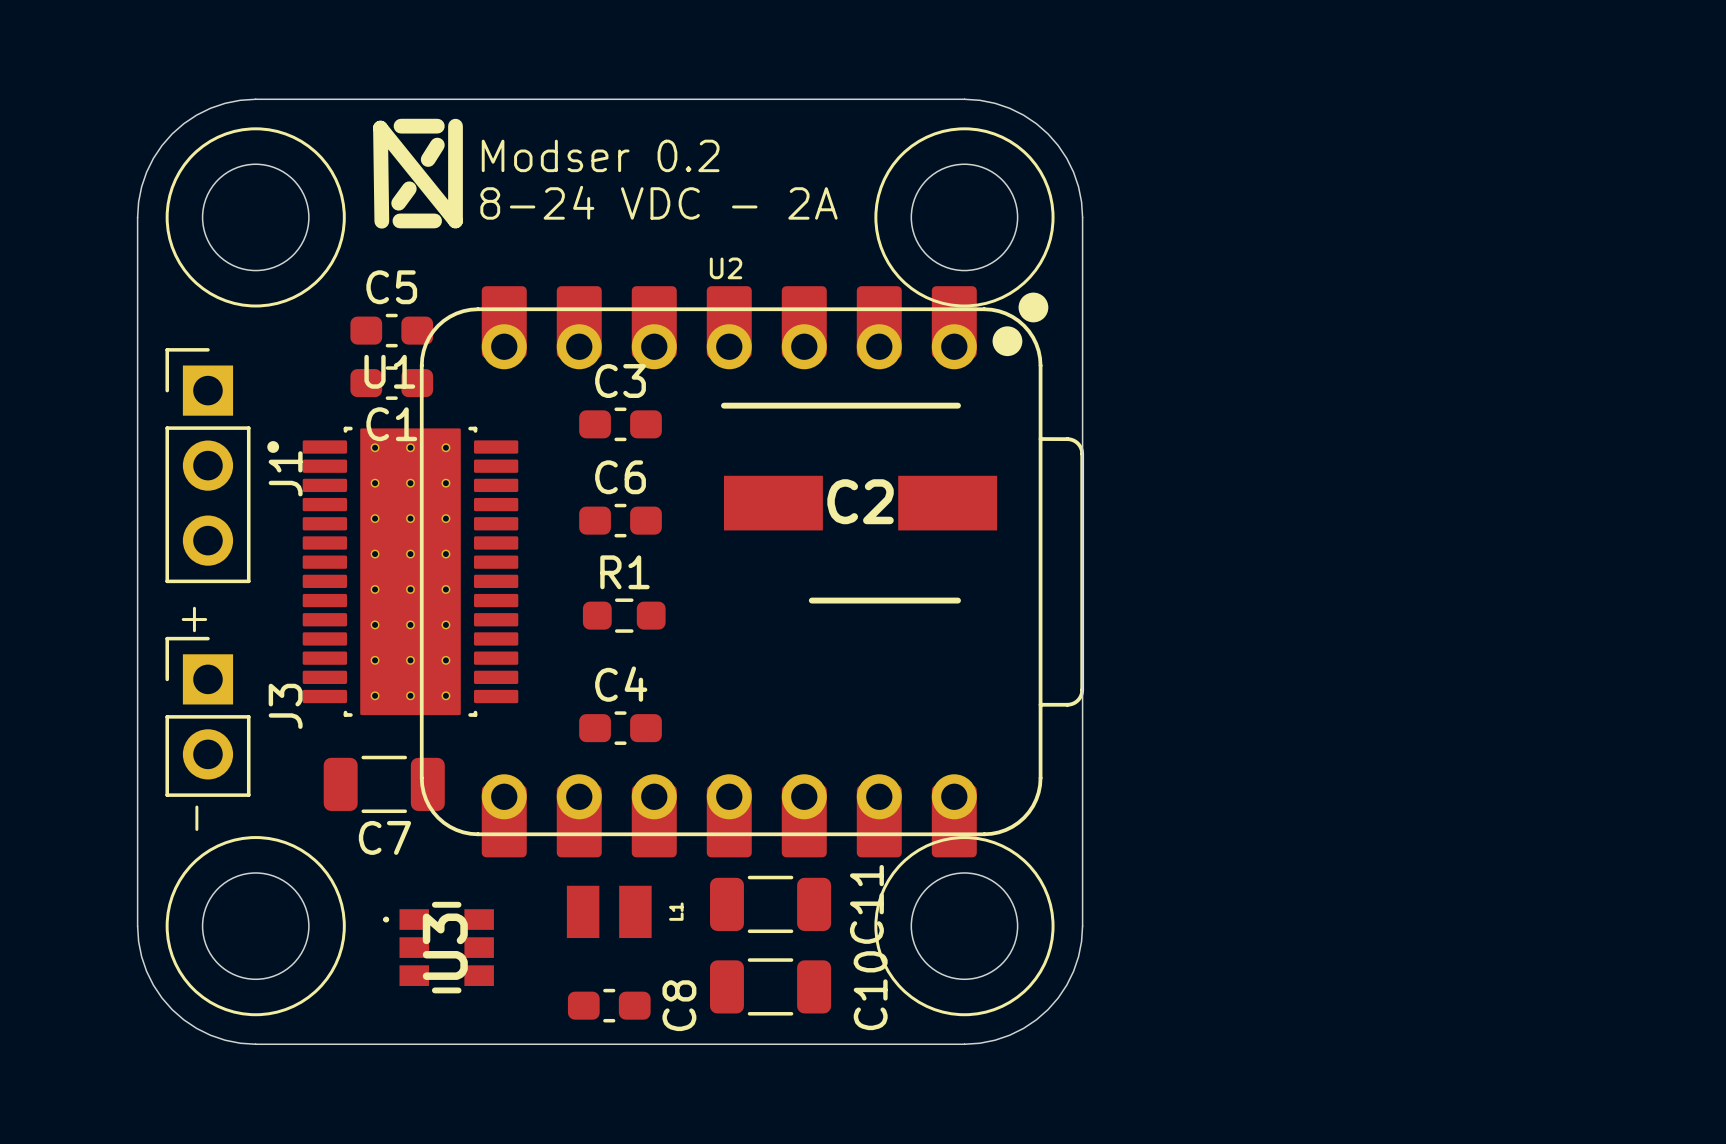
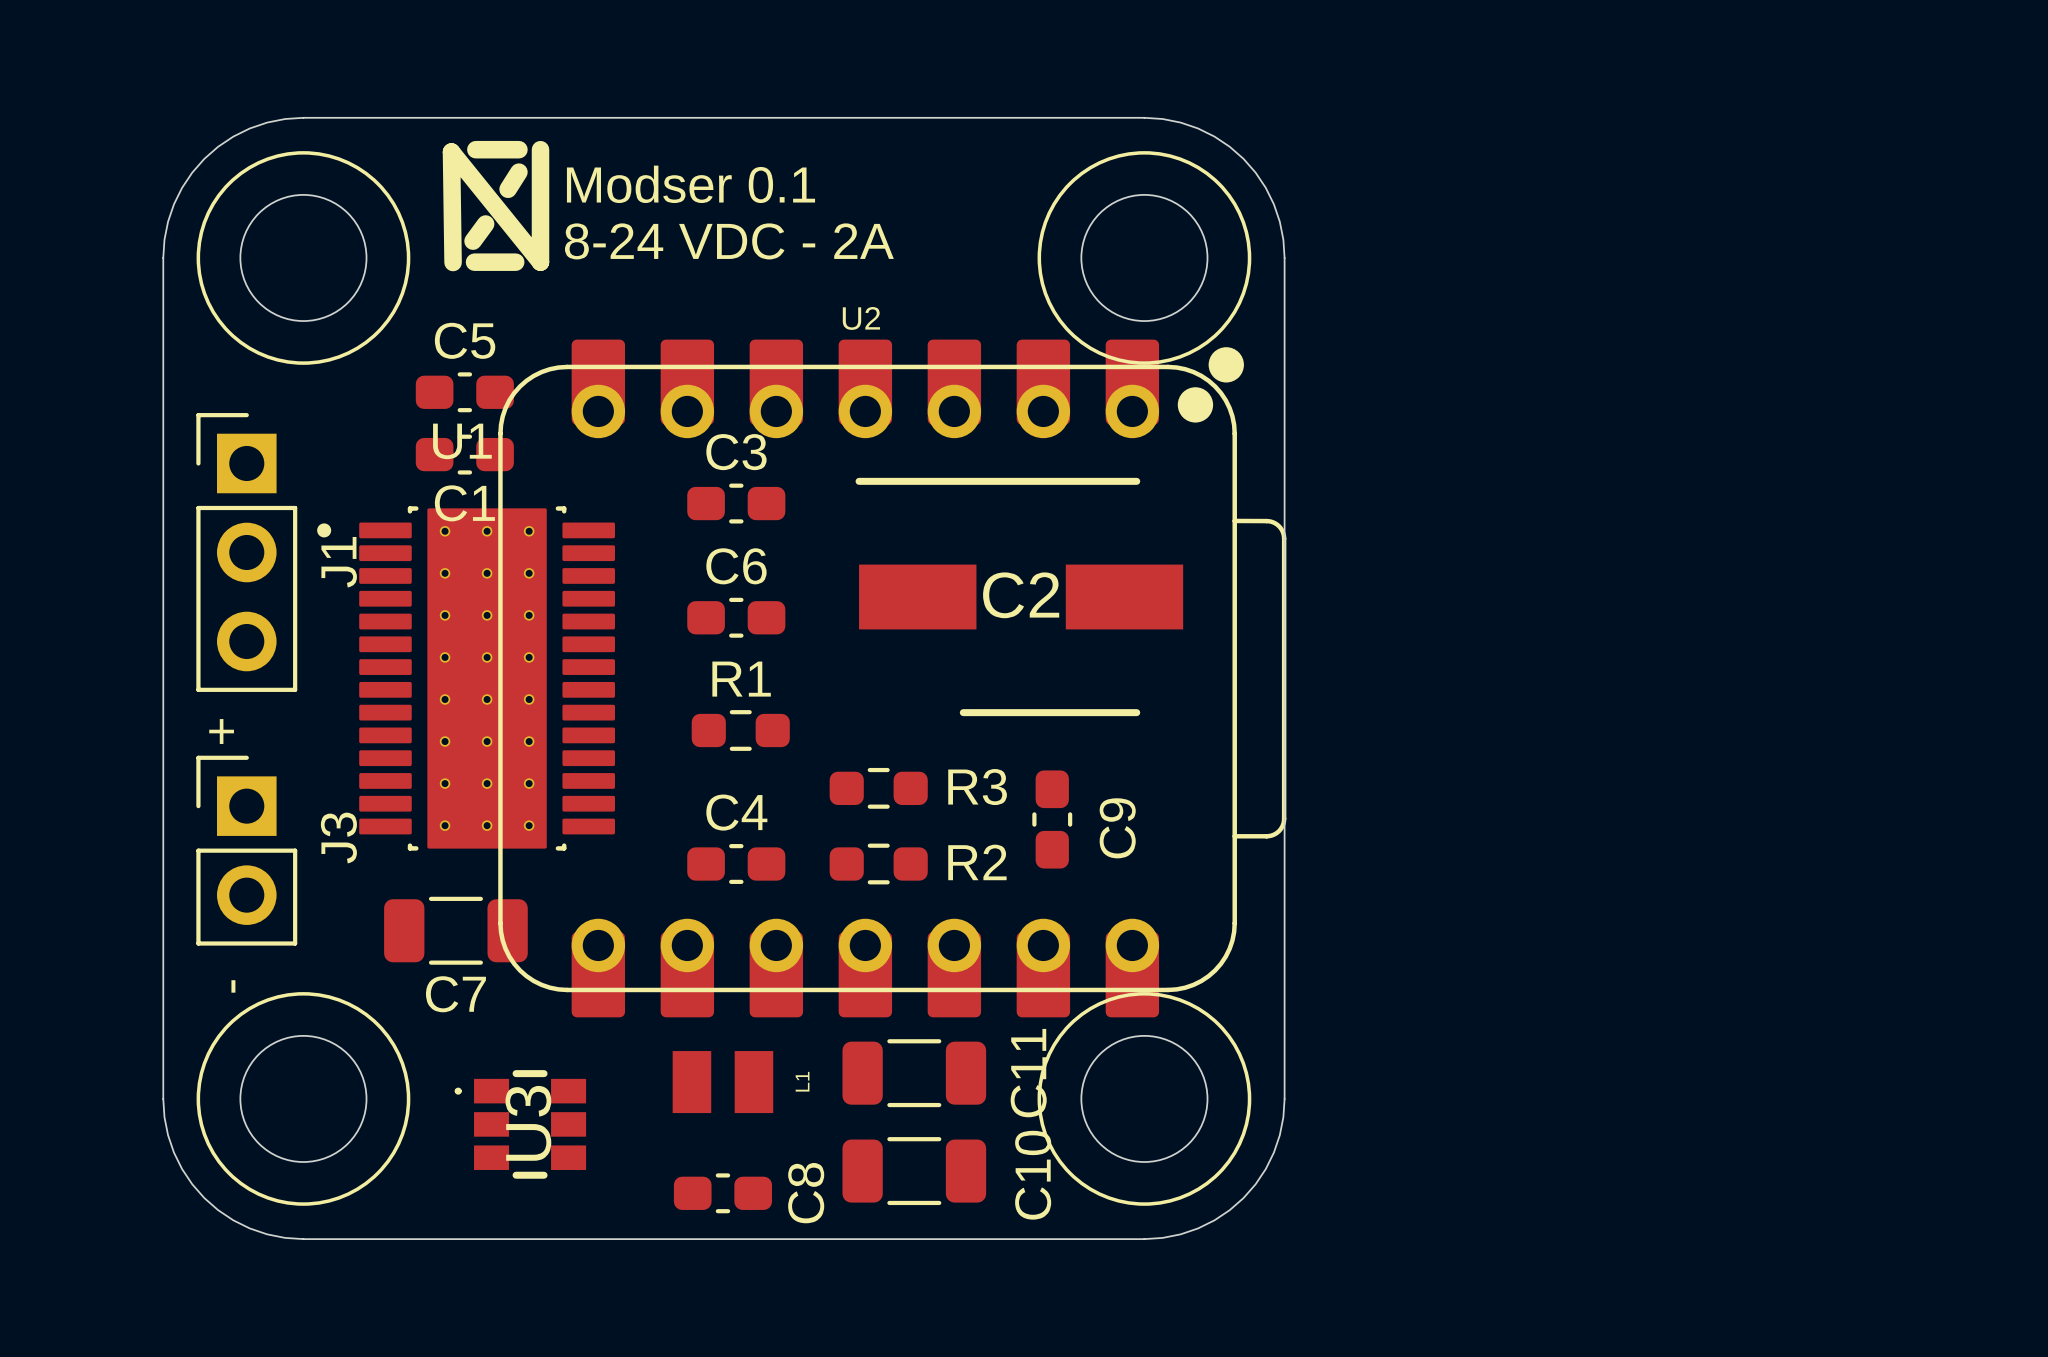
text: Modser 0.2 (600, 155) -> Modser 0.1 (690, 184)
R2: none -> (878, 788)
C9: none -> (1052, 819)
R3: none -> (878, 864)

